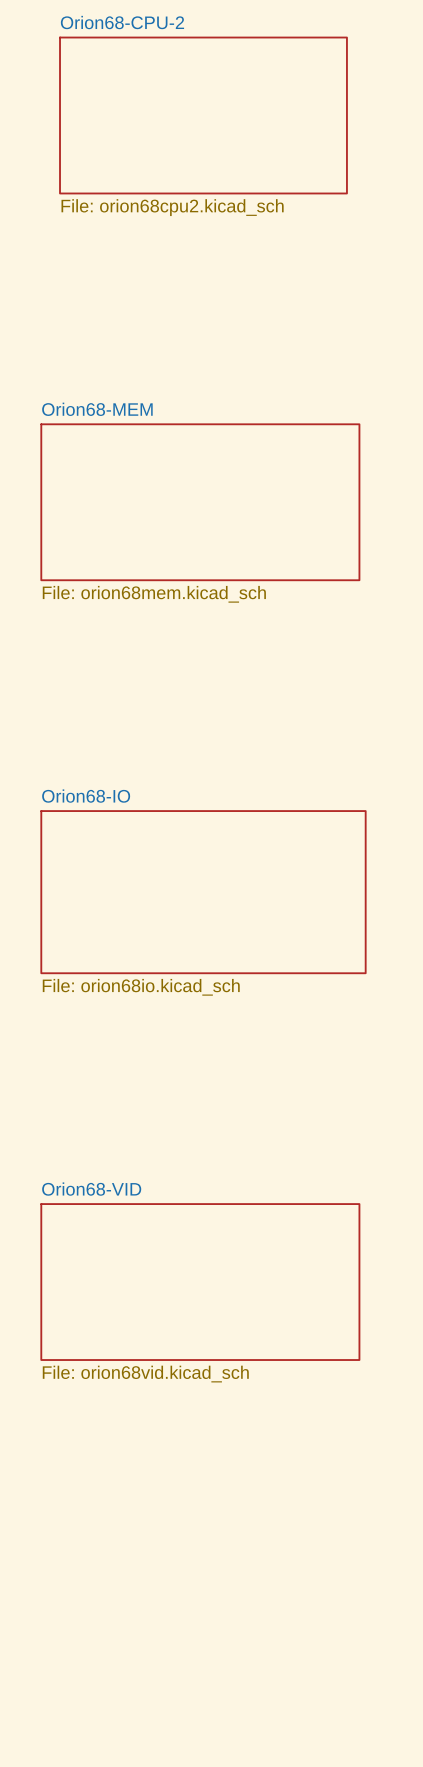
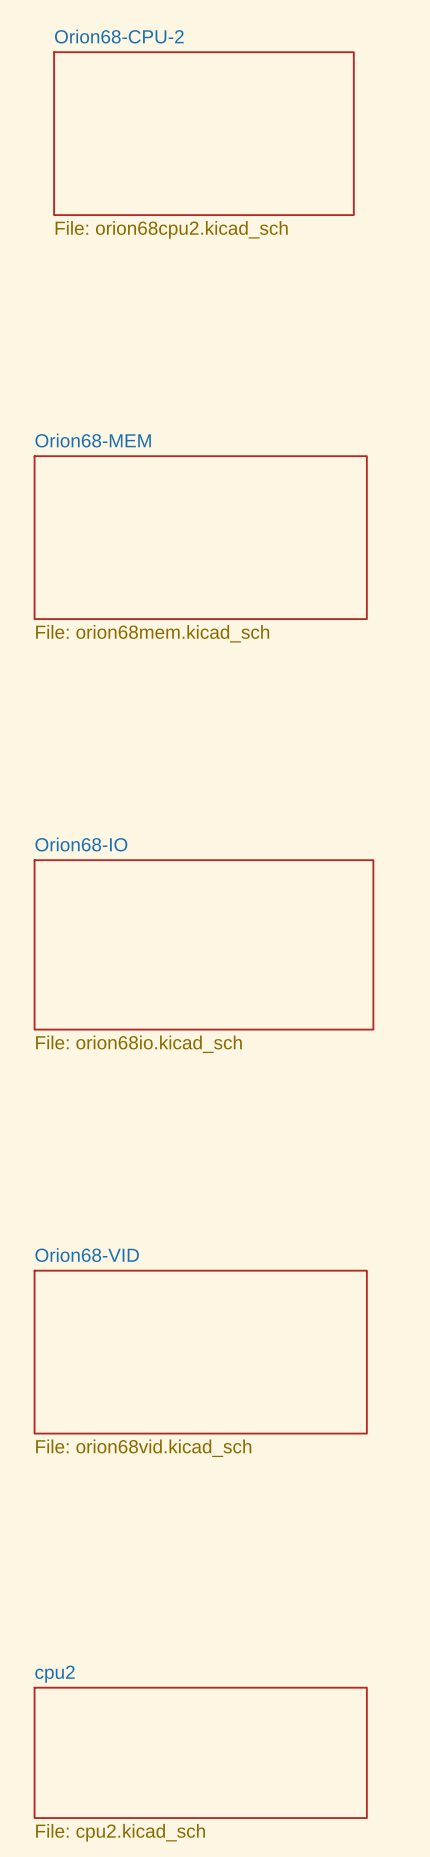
sheet cpu2: none -> File: cpu2.kicad_sch (200, 1752)

